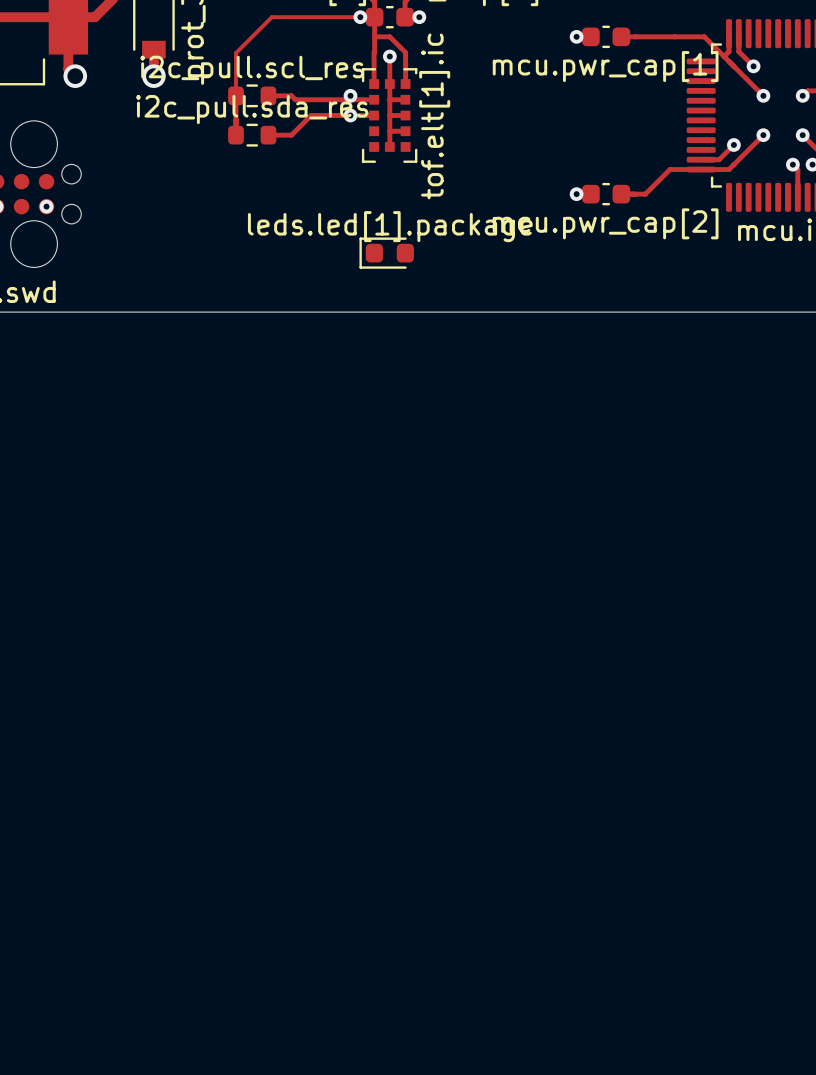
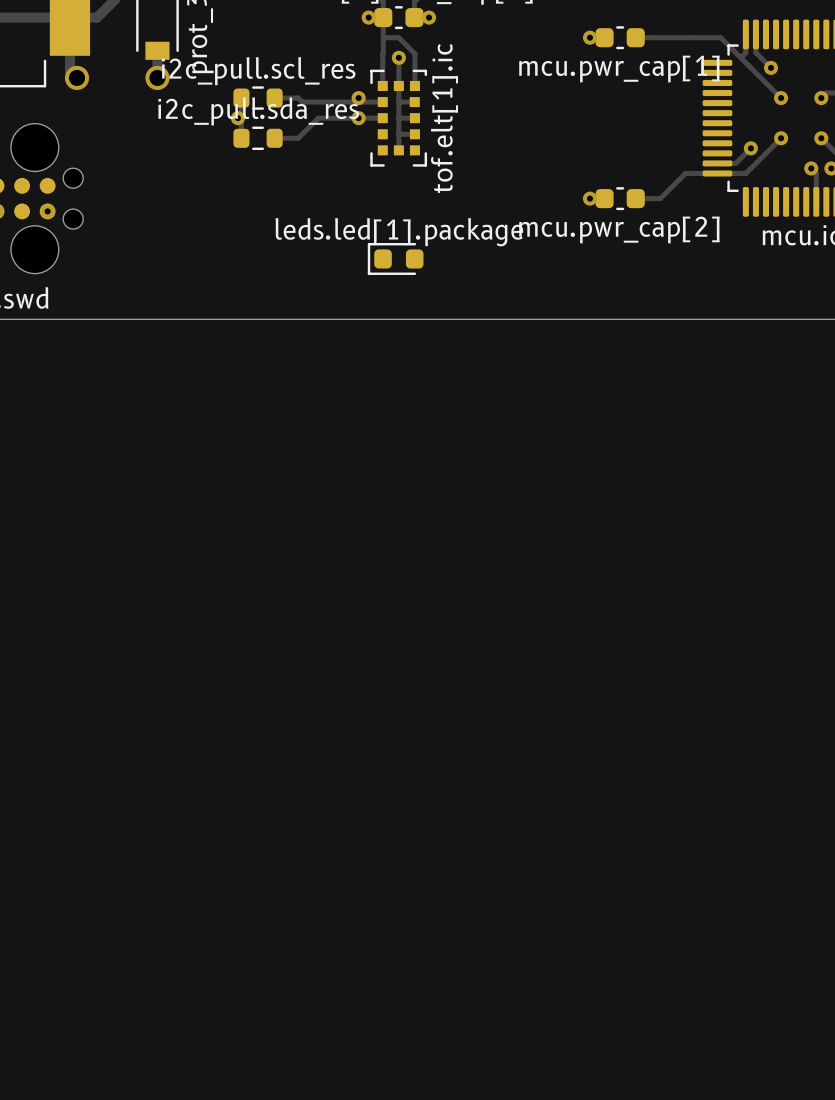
track: (360, 17) (271, 17) (235, 53) (235, 95) -> none
via: none -> (237, 118)

